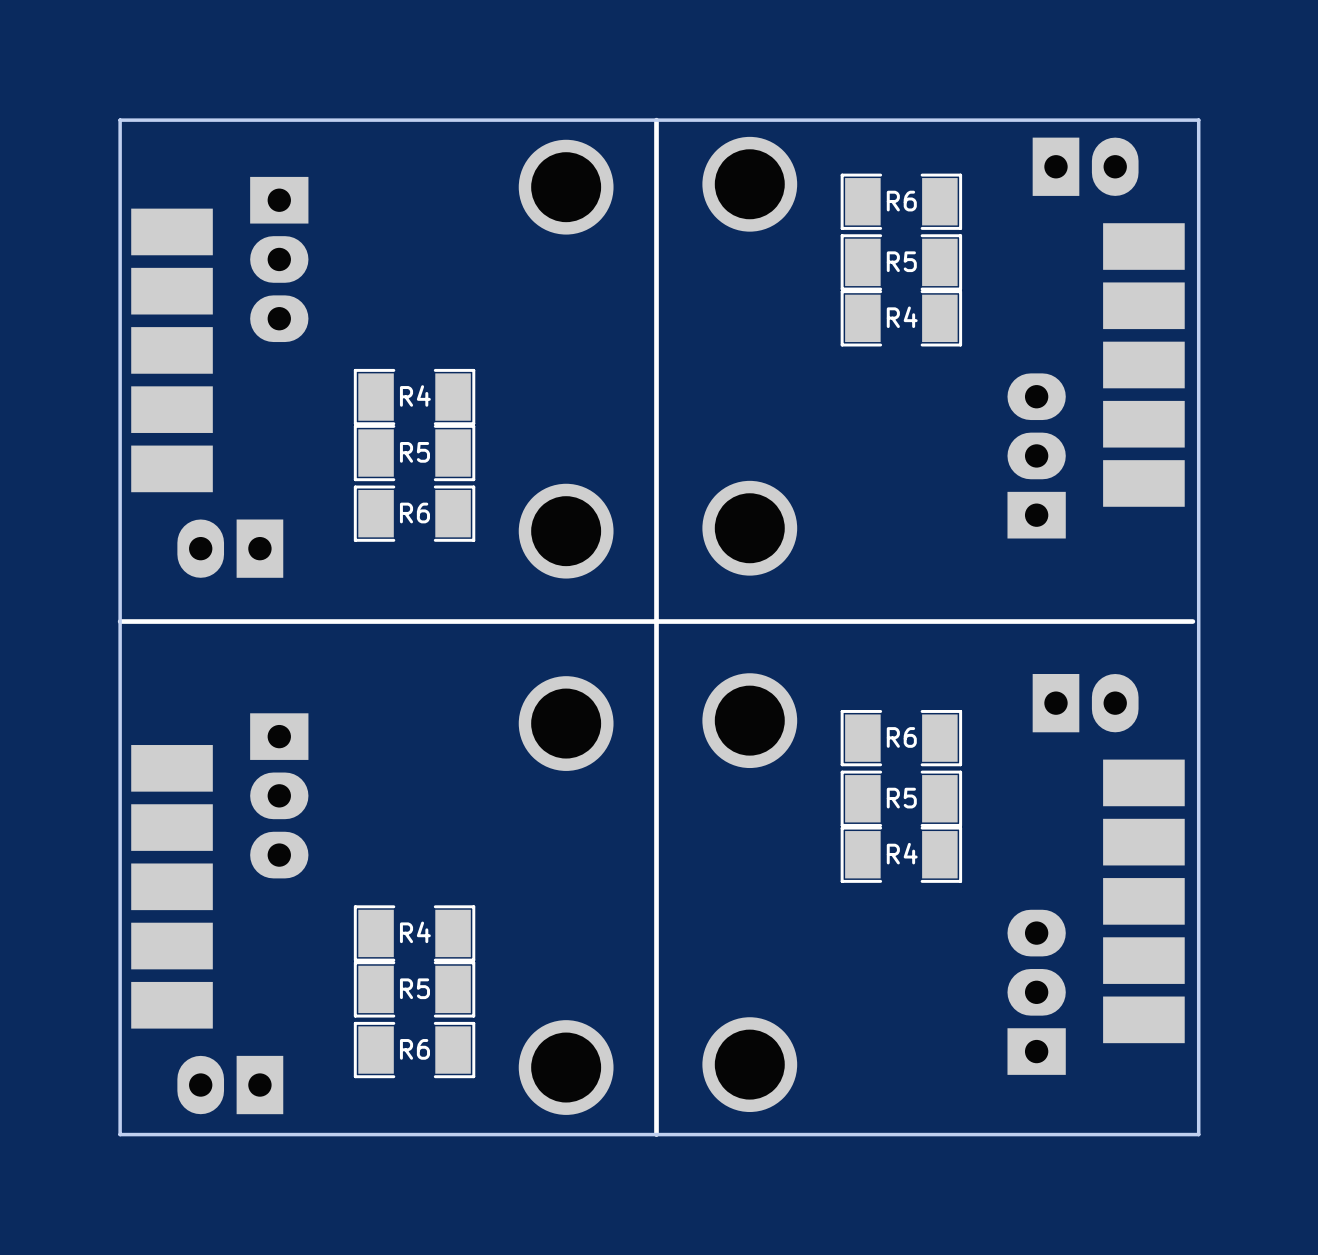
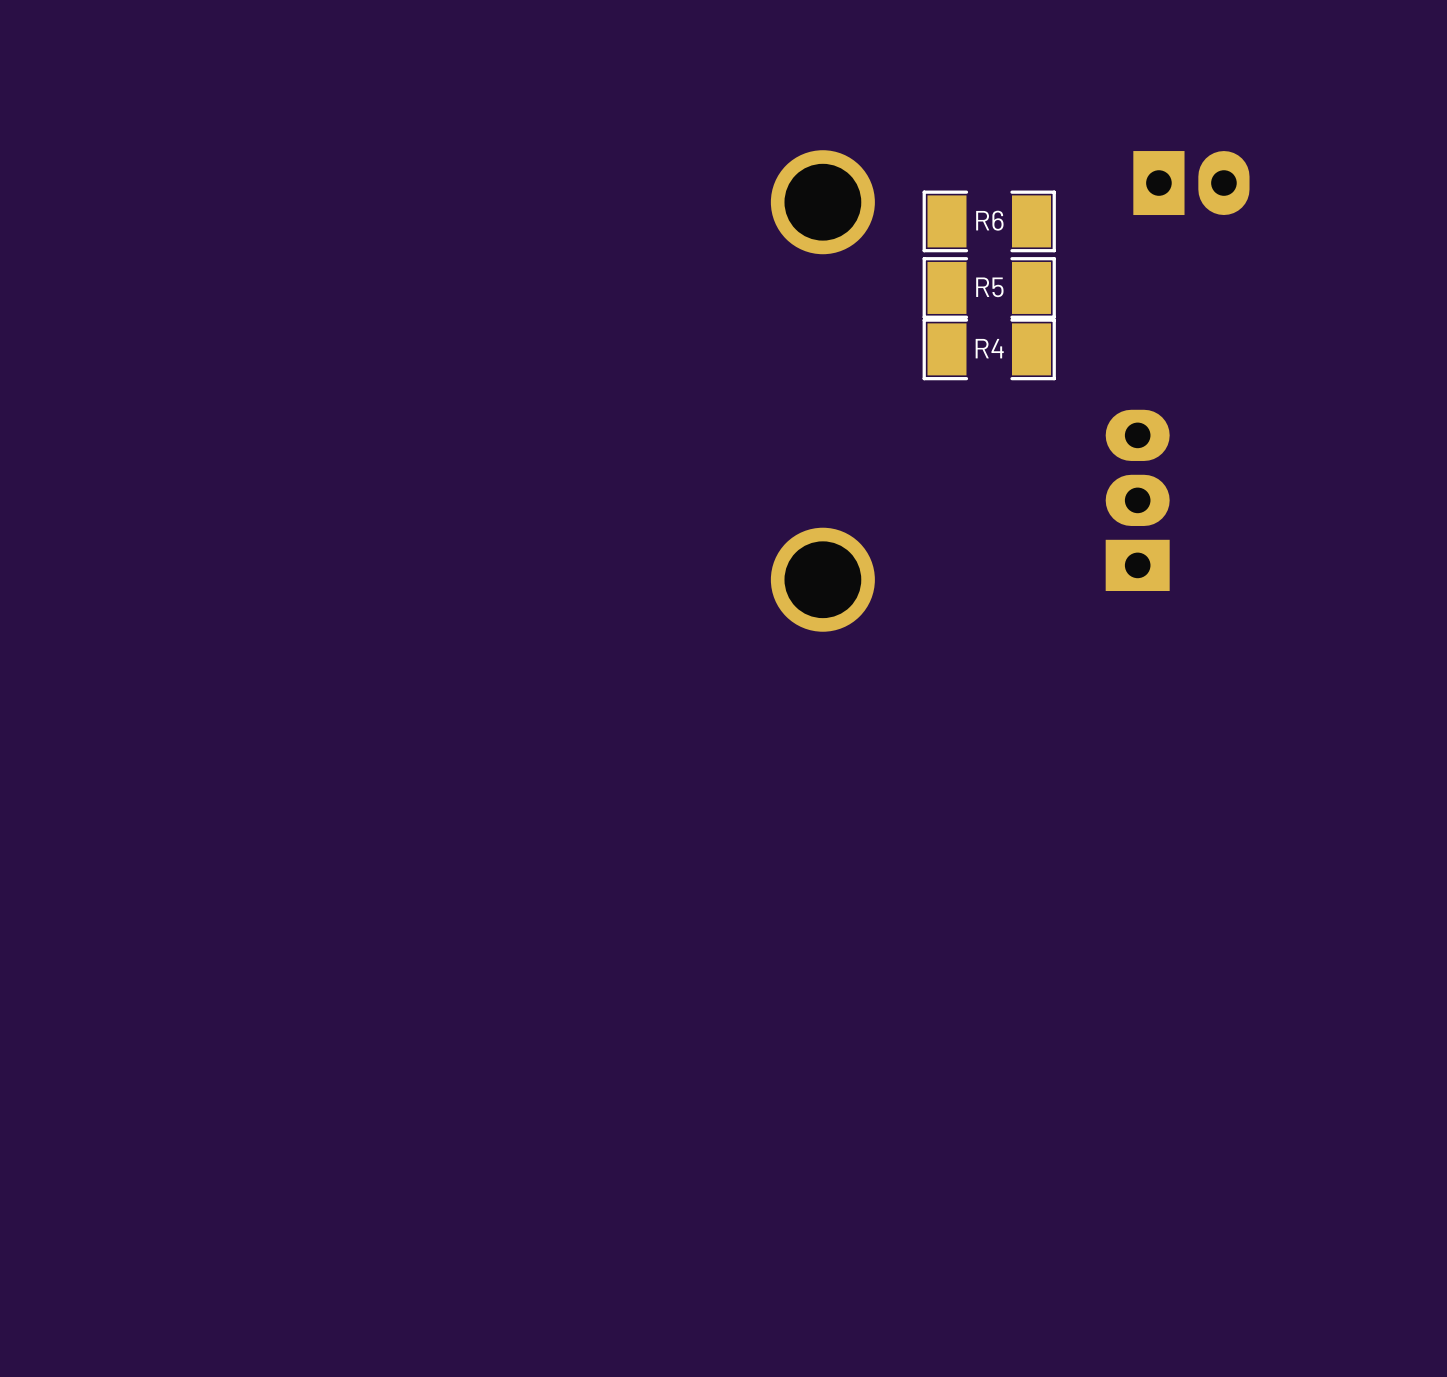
line: (656, 120) (656, 1134) -> none
board edge: (1198, 120) (120, 120) (120, 1134) (1198, 1134) (1198, 120) -> none
part: (566, 187) -> none
part: (279, 259) -> none
part: (172, 350) -> none
part: (1143, 364) -> none
R4: (414, 397) -> none
R5: (414, 453) -> none
R6: (414, 513) -> none
part: (566, 531) -> none
part: (230, 548) -> none
line: (1192, 621) (120, 621) -> none
part: (1085, 703) -> none
part: (749, 720) -> none
part: (566, 723) -> none
R6: (901, 738) -> none
part: (279, 795) -> none
R5: (901, 798) -> none
R4: (901, 854) -> none
part: (172, 886) -> none
part: (1143, 901) -> none
R4: (414, 933) -> none
R5: (414, 989) -> none
part: (1036, 992) -> none
R6: (414, 1050) -> none
part: (749, 1064) -> none
part: (566, 1067) -> none
part: (230, 1085) -> none

